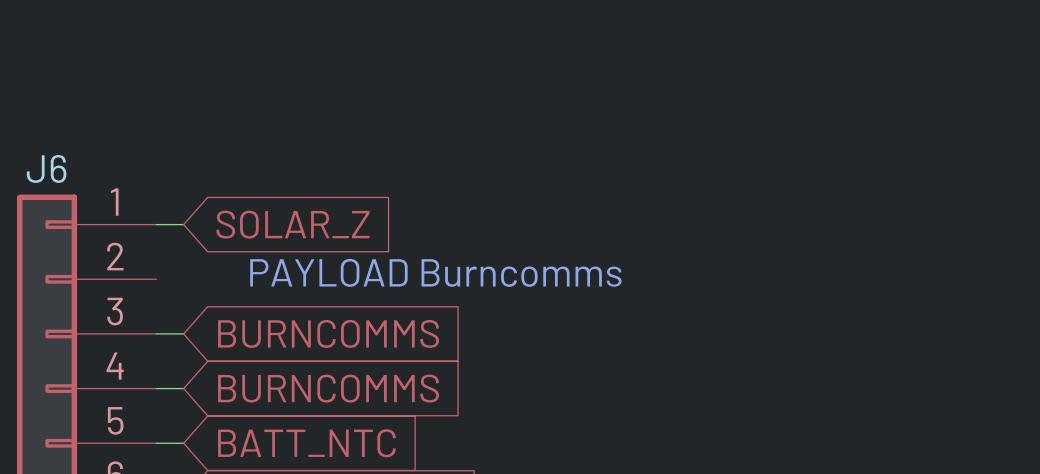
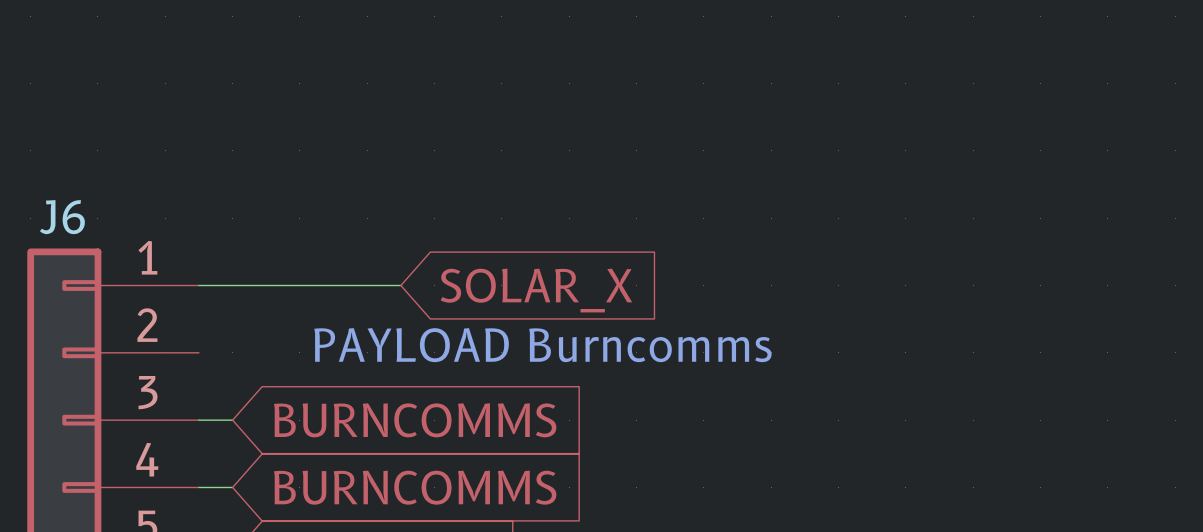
wire: none -> (232, 285) (400, 285)
global label: SOLAR_Z (293, 224) -> SOLAR_X (536, 290)

